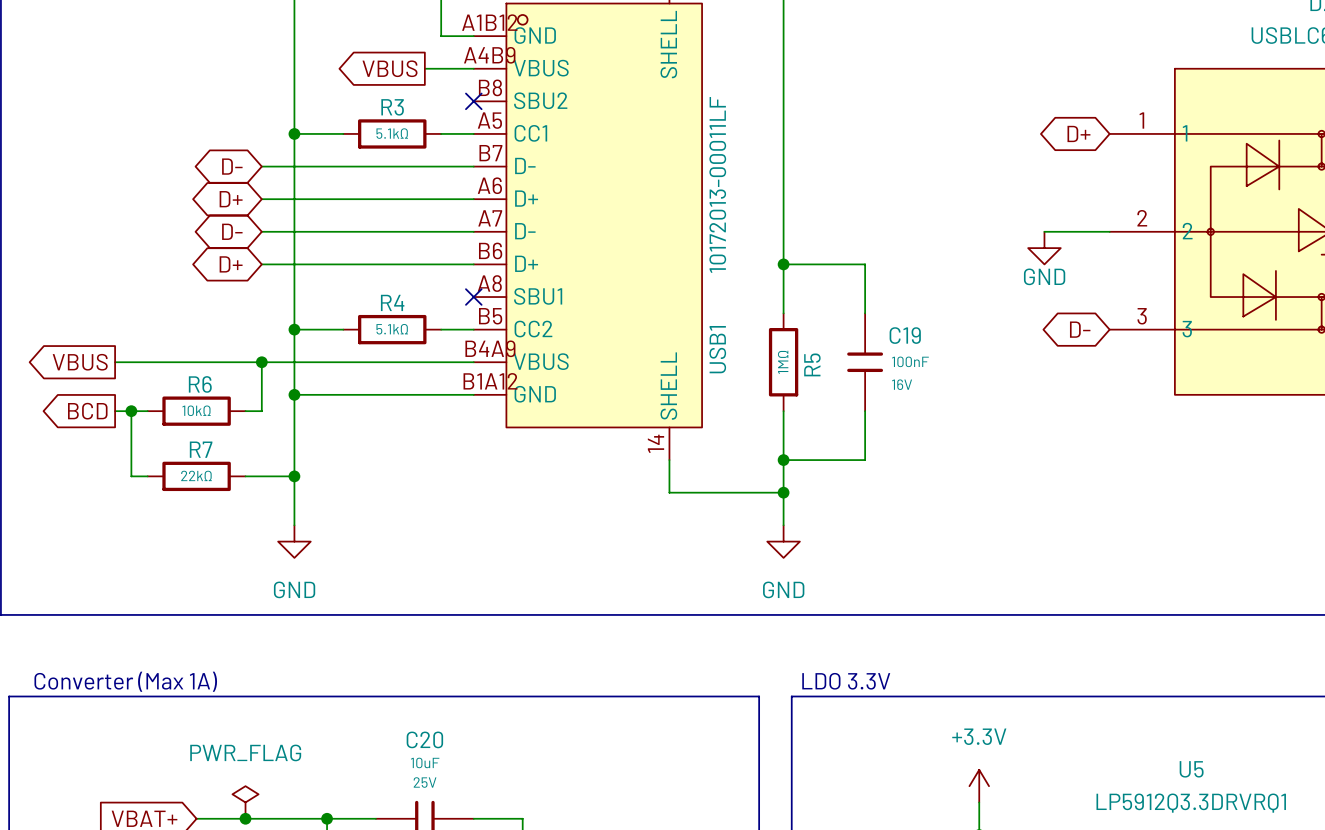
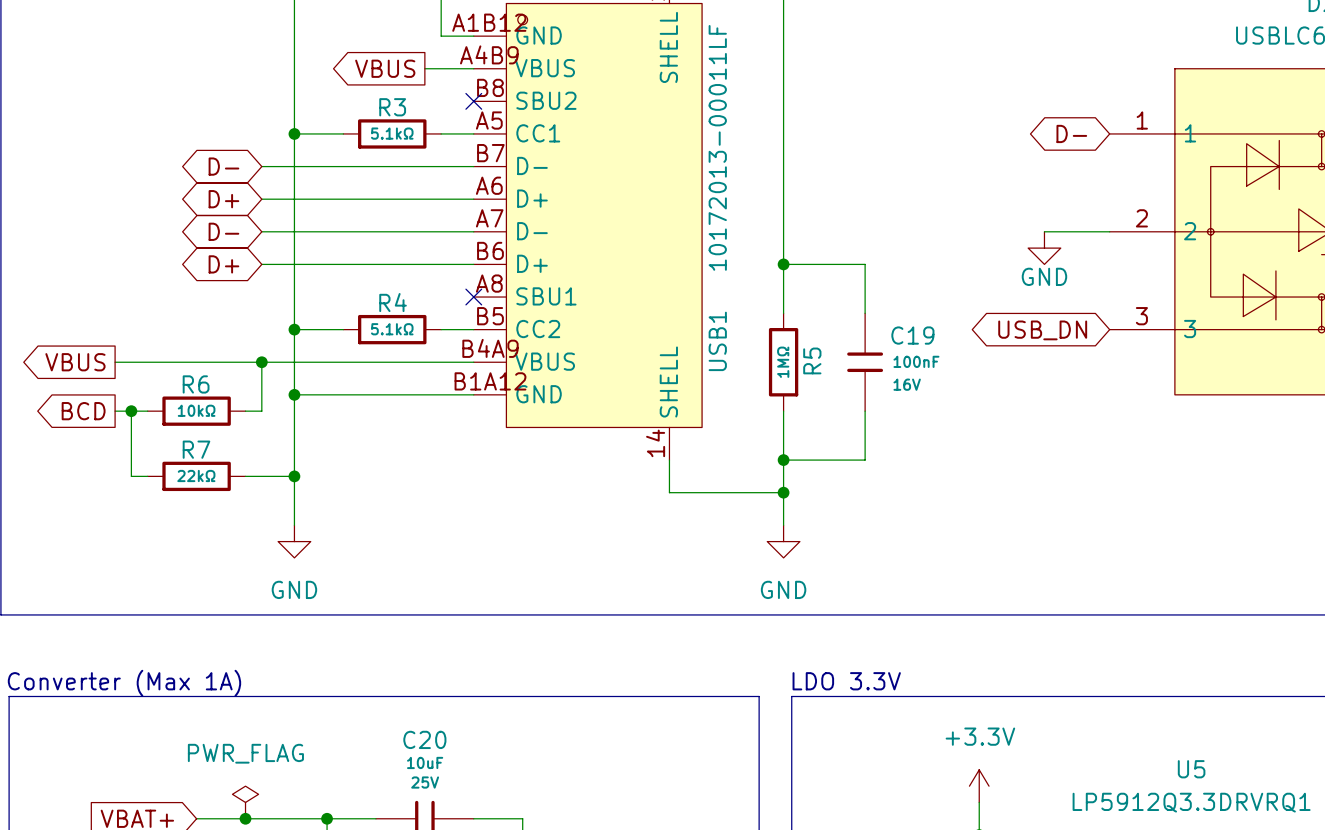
global label: D+ (1078, 133) -> D- (1071, 133)
global label: D- (1080, 329) -> USB_DN (1042, 330)

